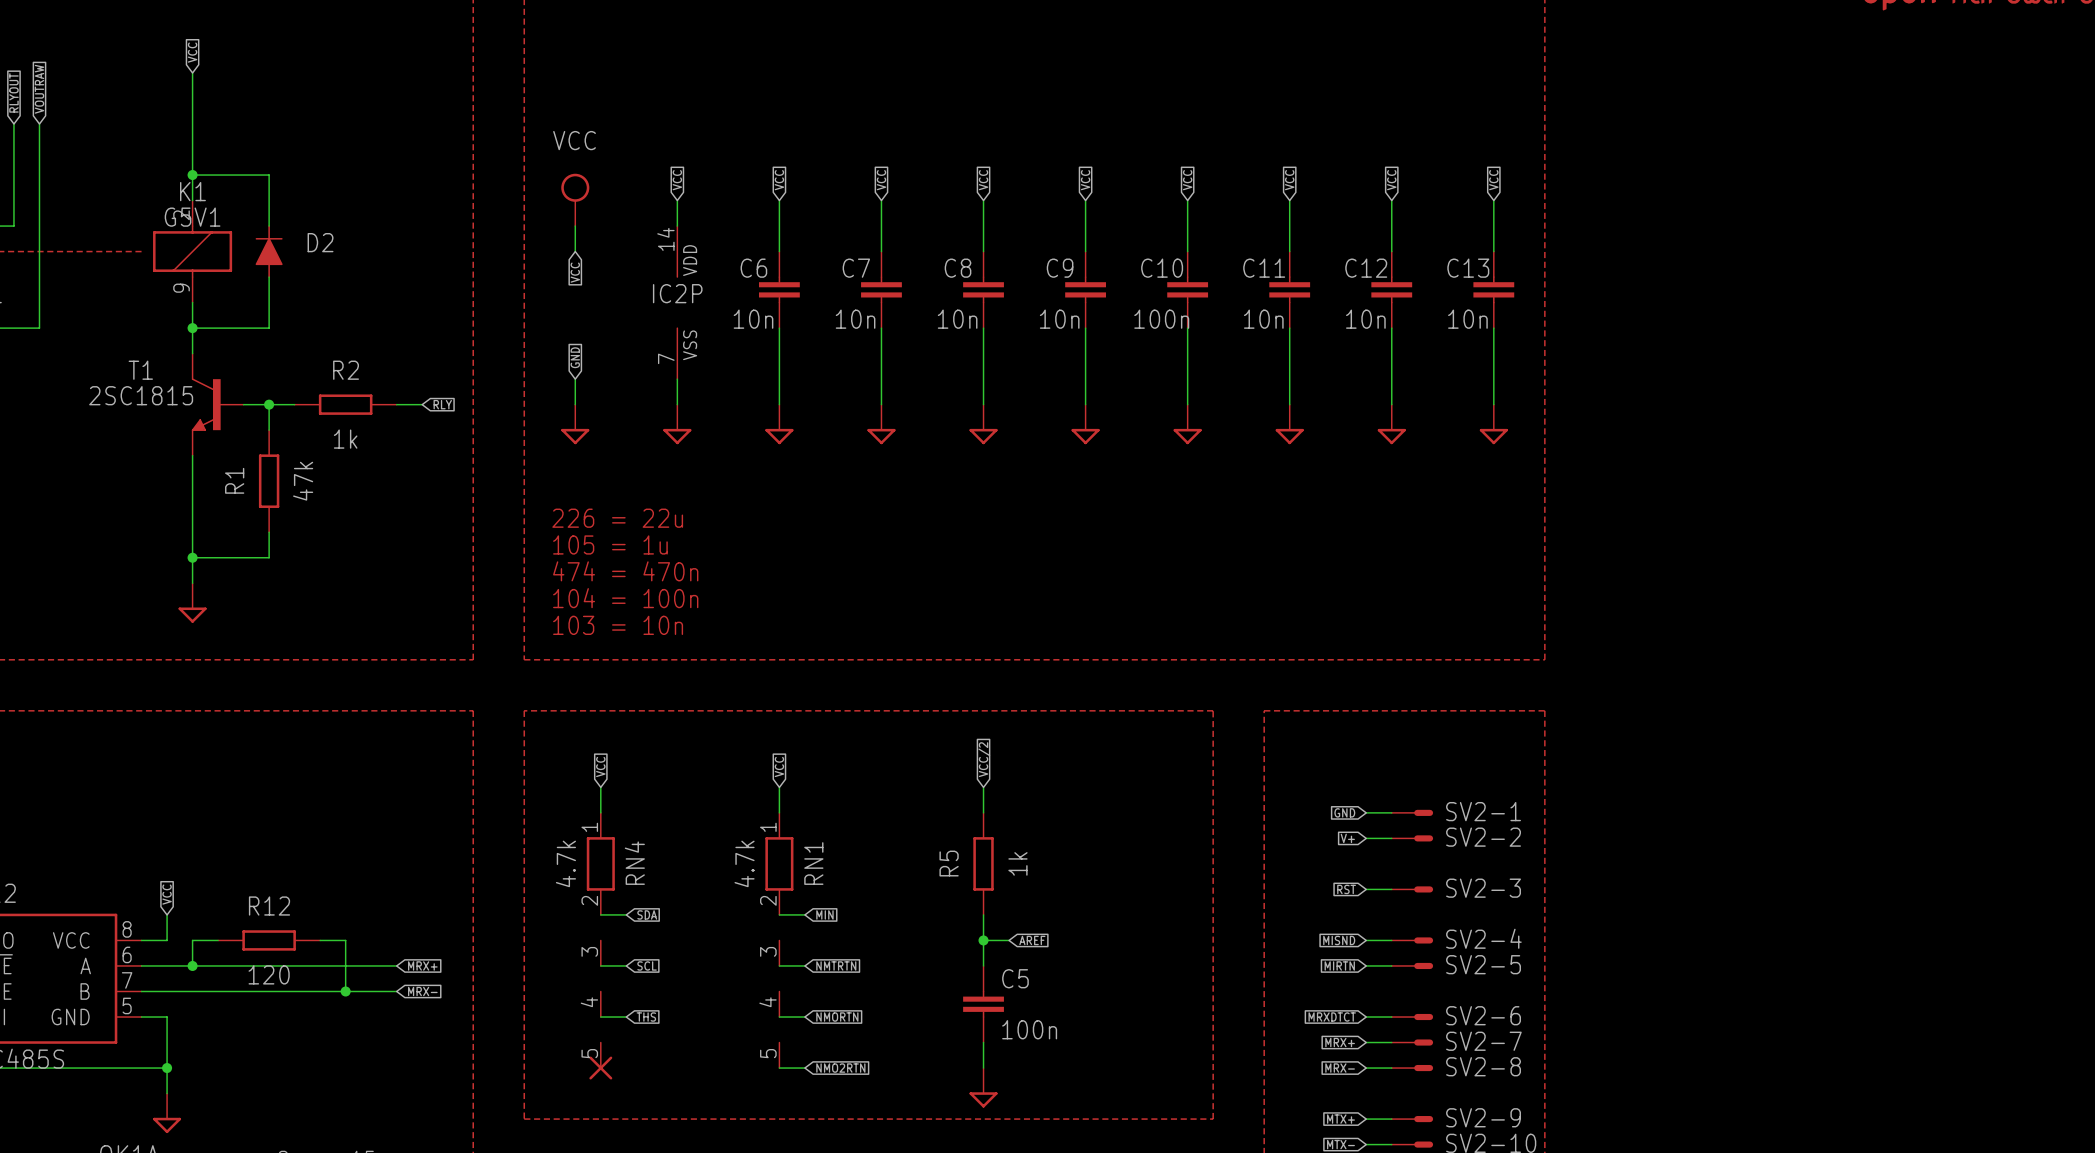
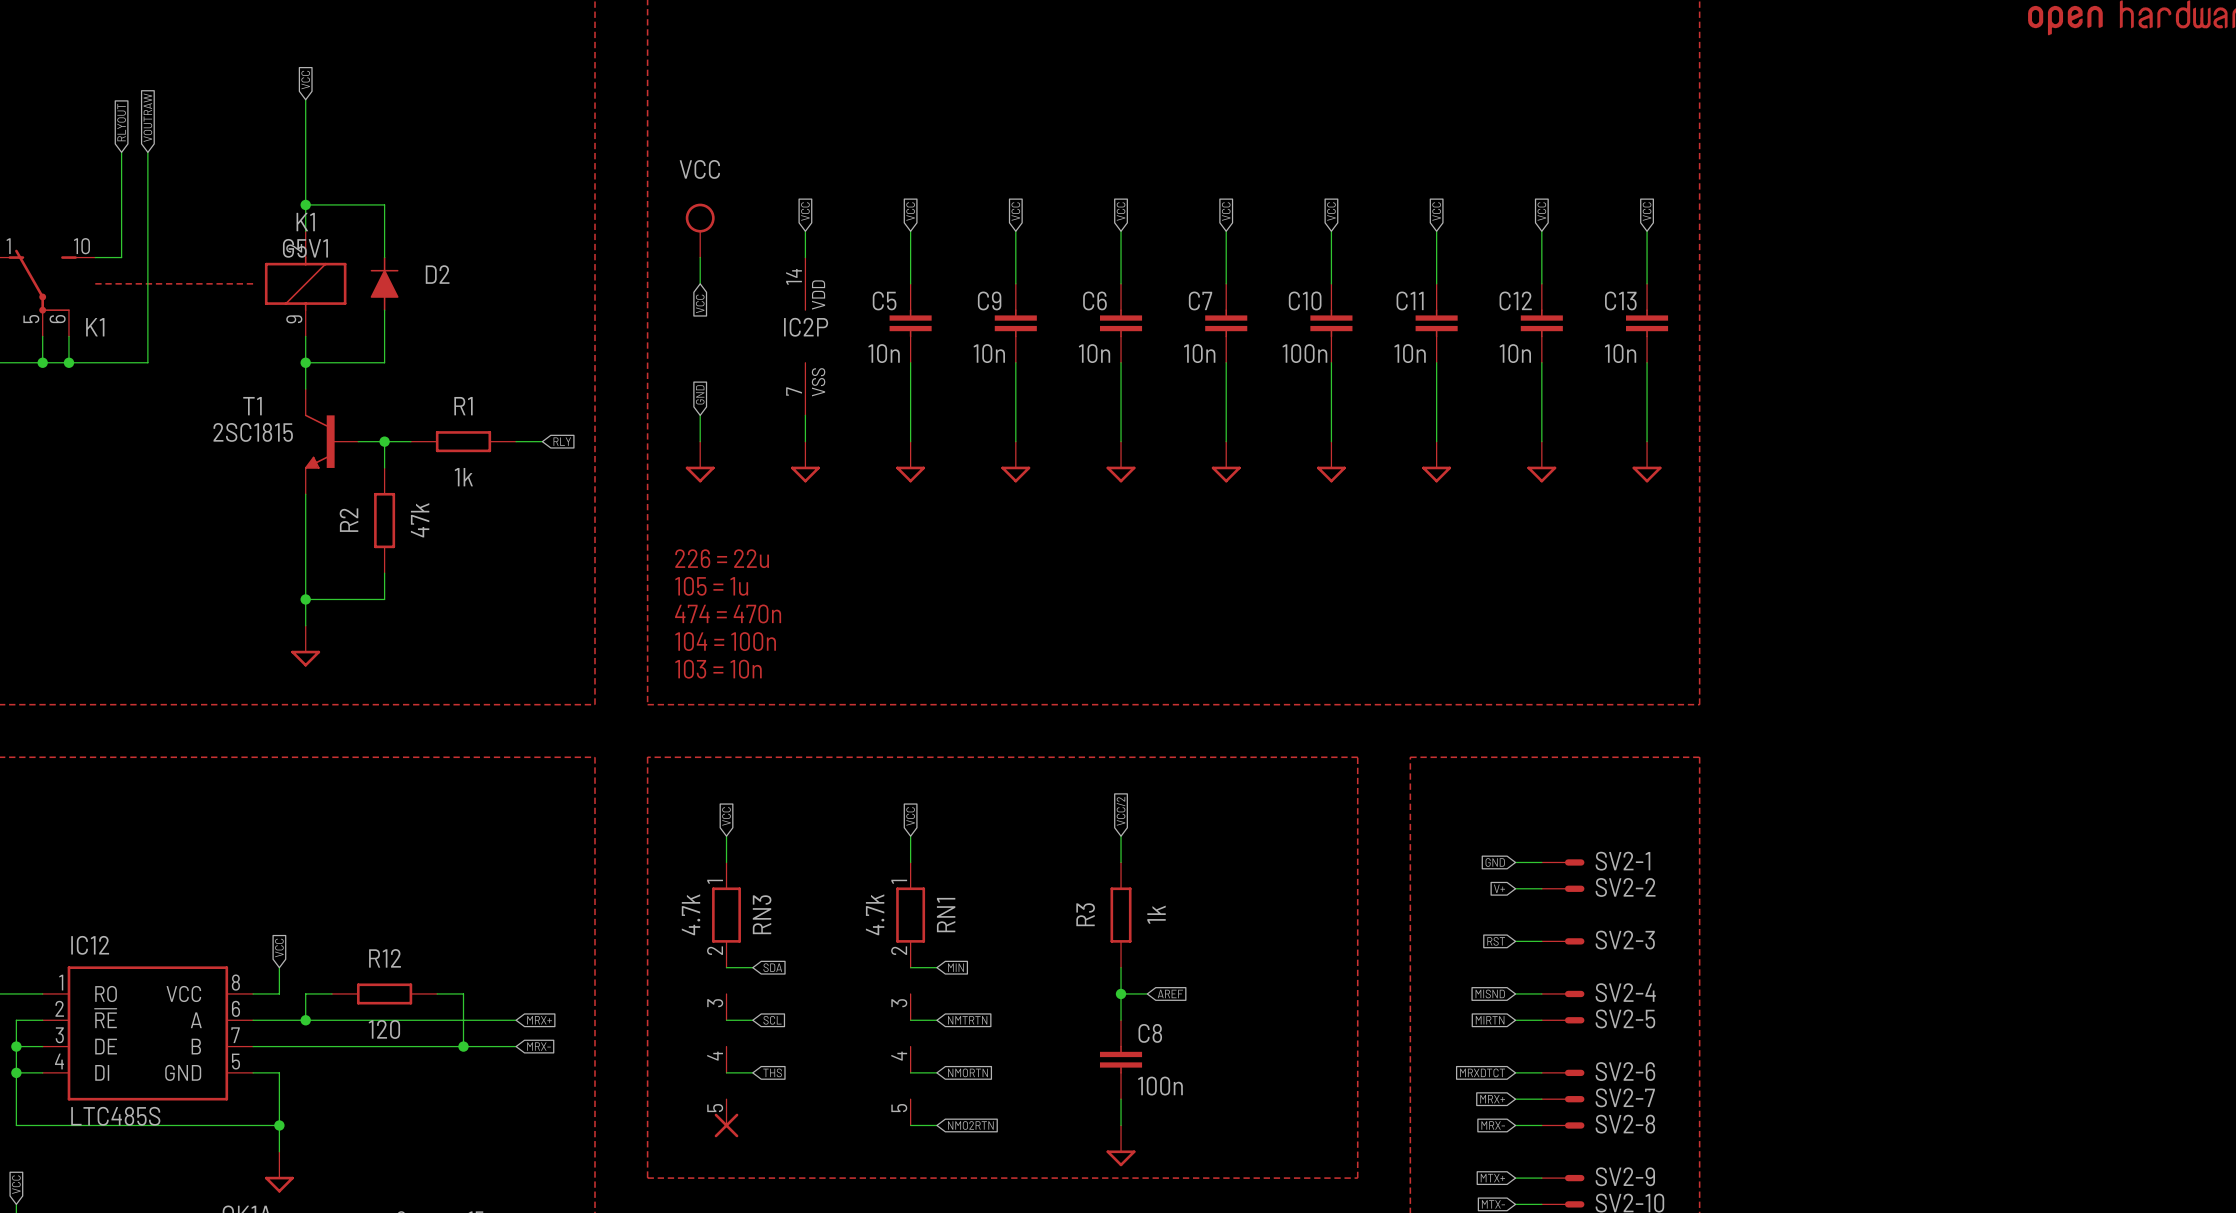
C6 name: C6 (753, 268) -> C5 (884, 300)
C7 name: C7 (856, 268) -> C9 (989, 300)
C8 name: C8 (958, 268) -> C6 (1094, 300)
C9 name: C9 (1060, 268) -> C7 (1200, 300)
R2 name: R2 (346, 370) -> R1 (463, 406)
R1 name: R1 (234, 480) -> R2 (348, 520)
RN4 name: RN4 (634, 863) -> RN3 (762, 914)
R5 name: R5 (949, 863) -> R3 (1085, 914)
C5 name: C5 (1015, 978) -> C8 (1150, 1033)

